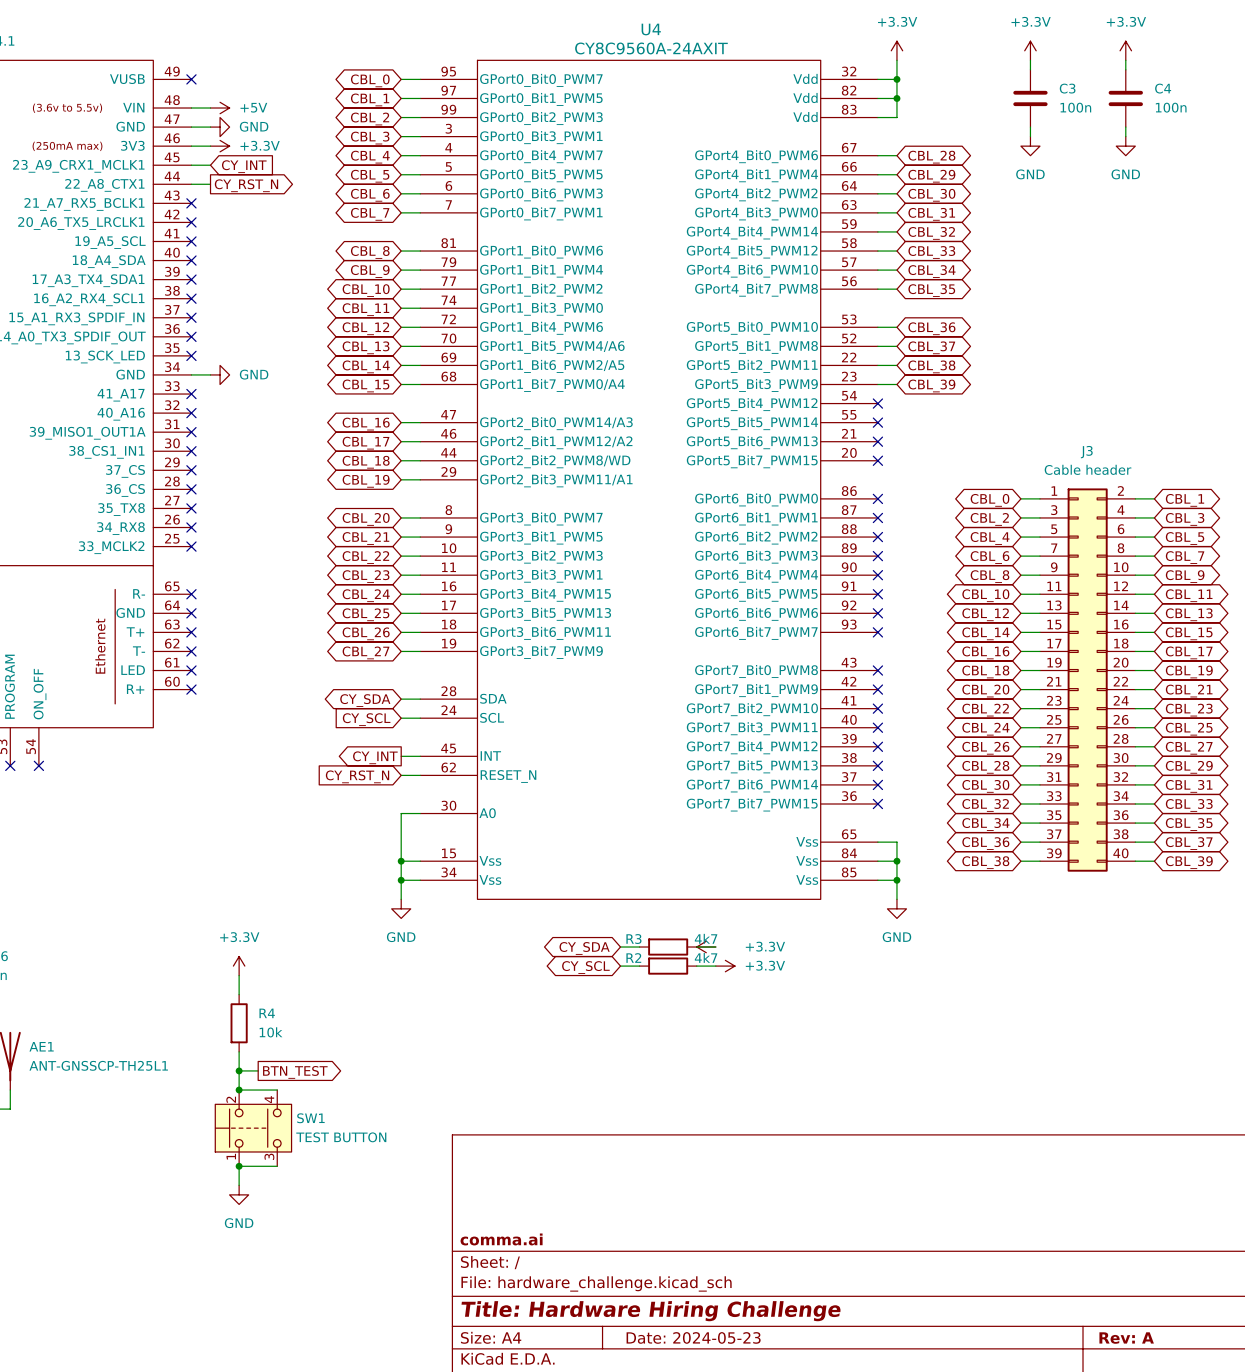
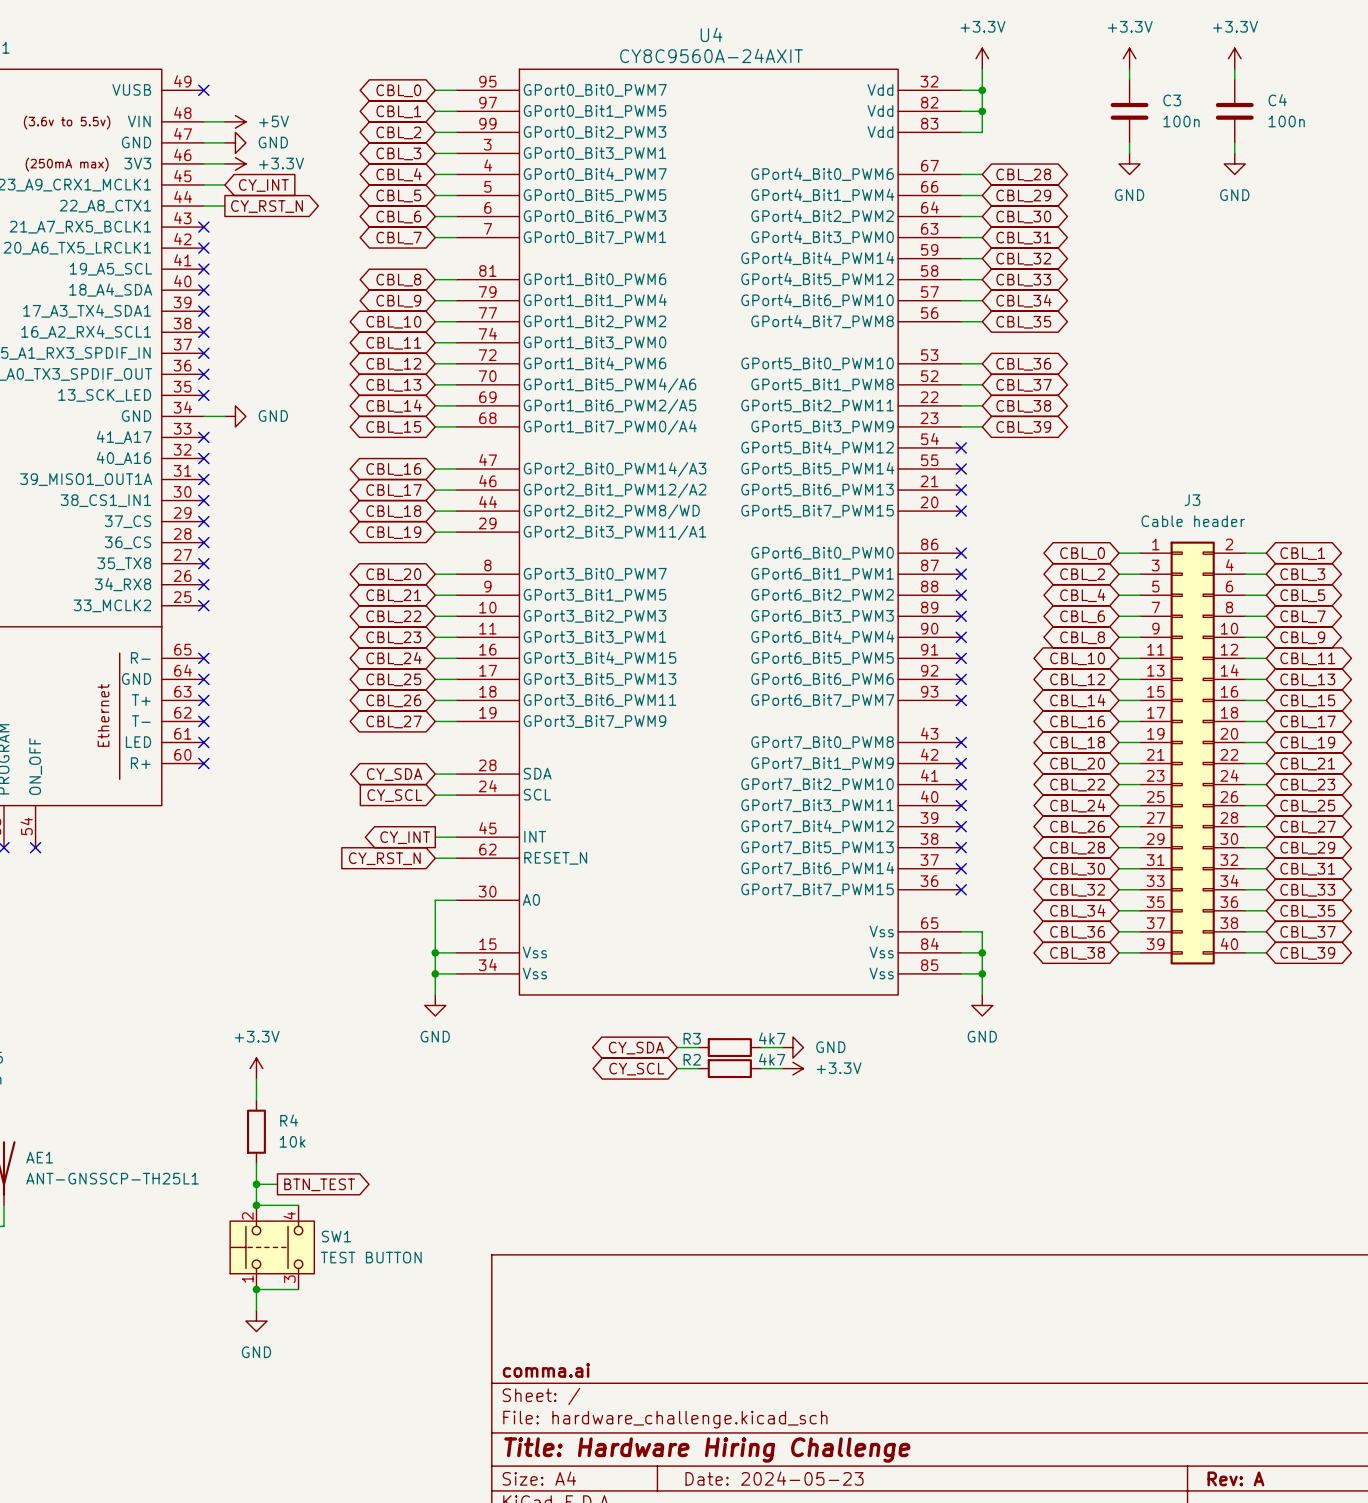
power symbol: +3.3V (706, 947) -> none
power symbol: none -> GND (792, 1047)

